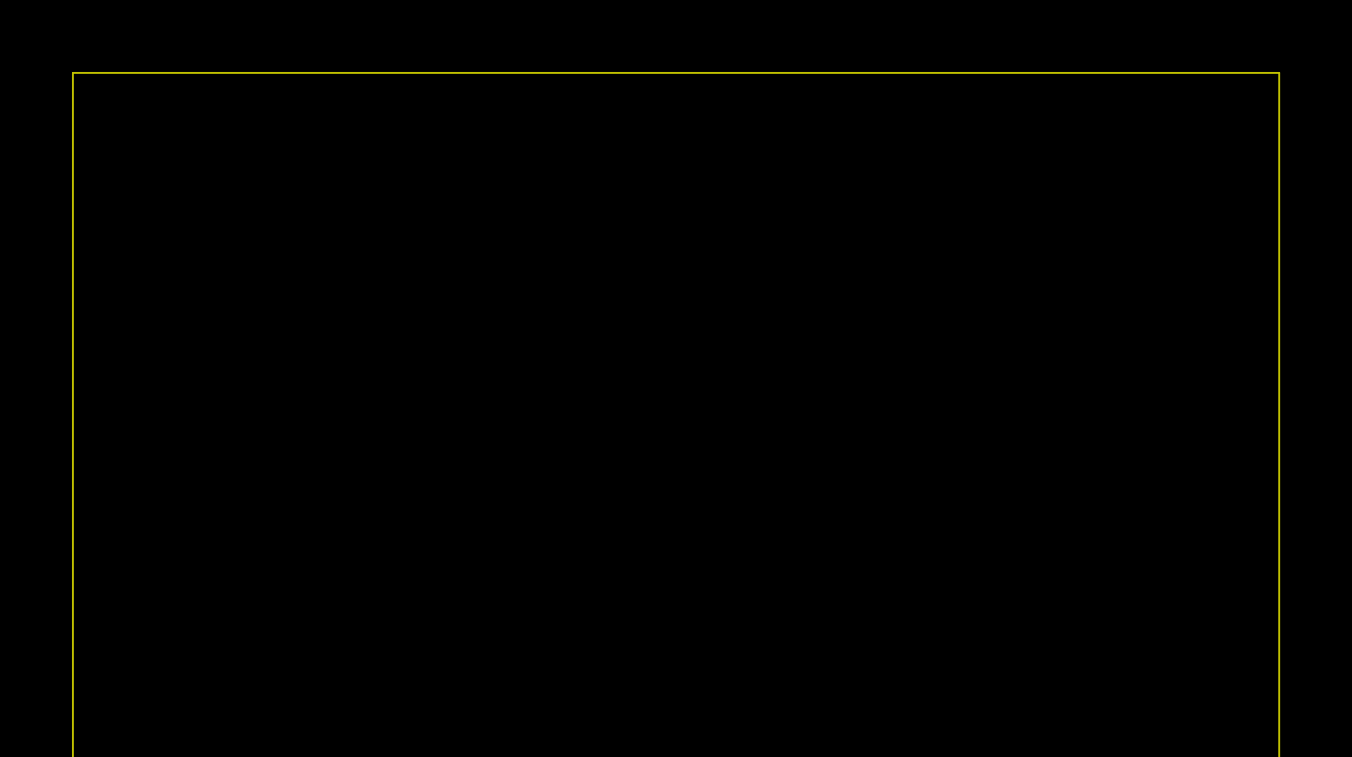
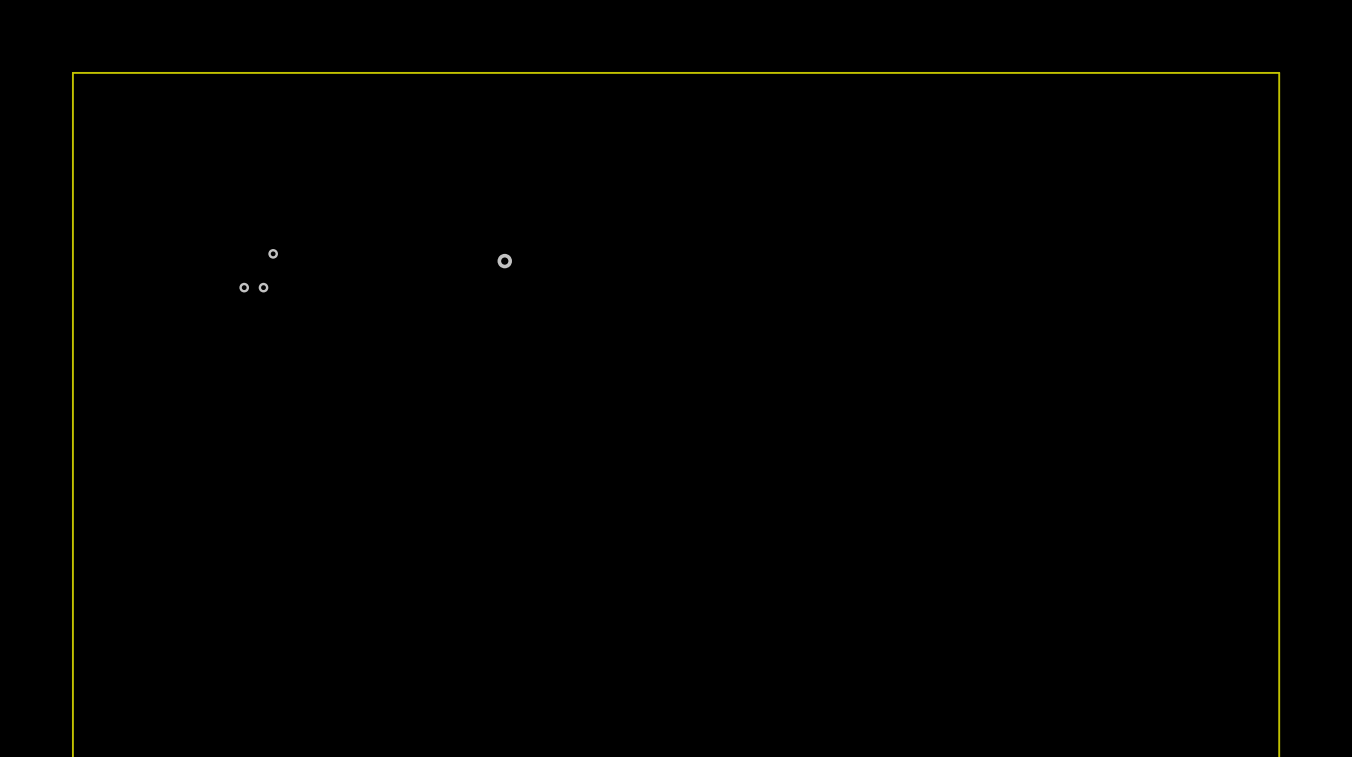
via: none -> (273, 253)
via: none -> (504, 261)
via: none -> (244, 287)
via: none -> (263, 287)

